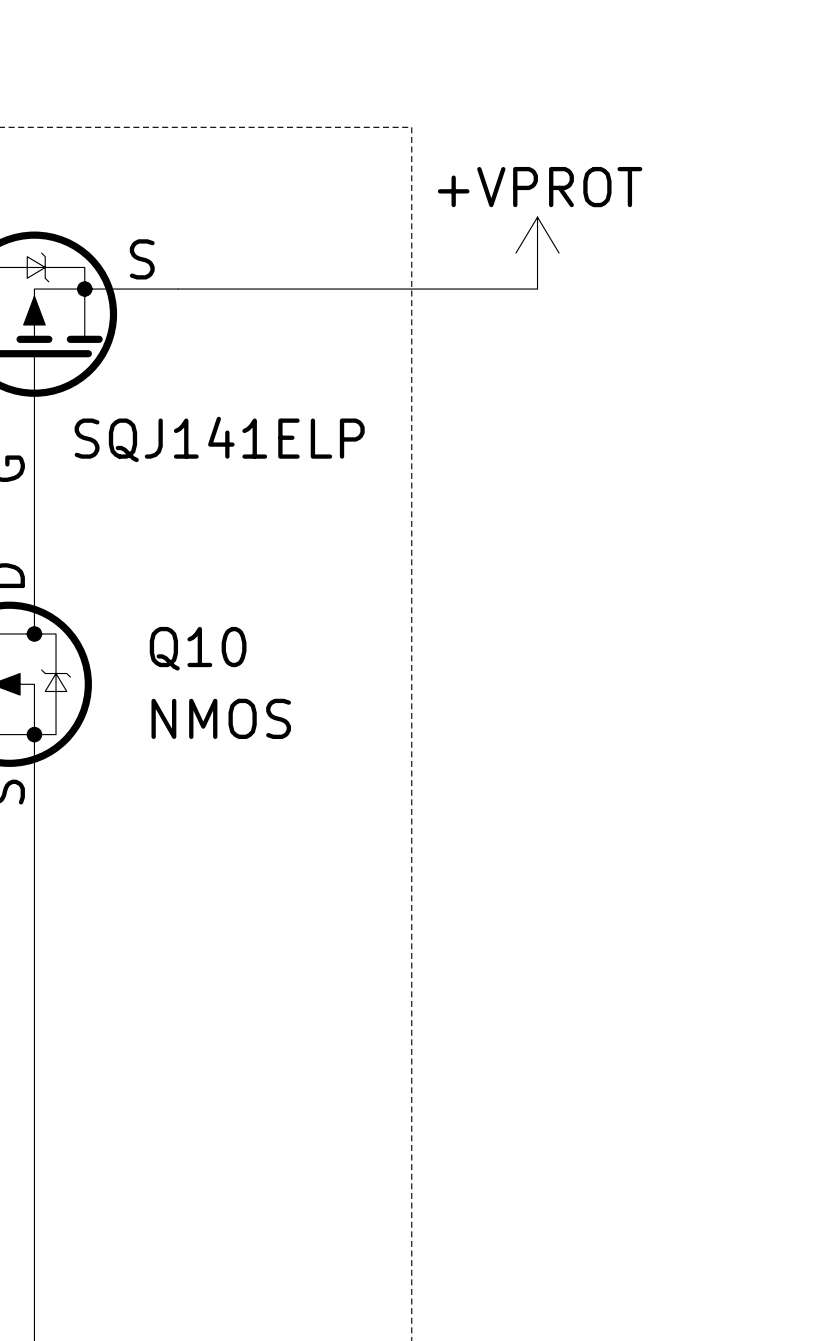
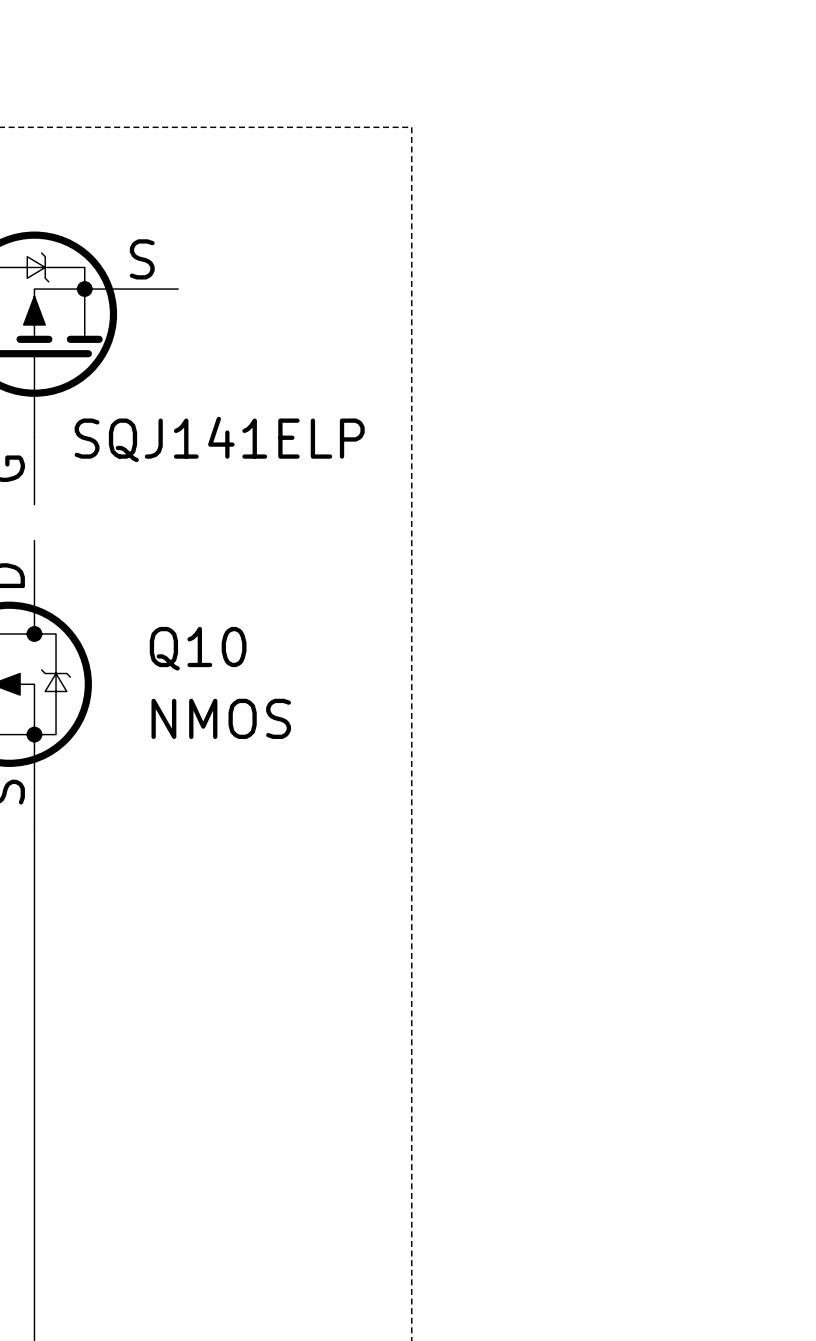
power symbol: +VPROT (537, 253) -> none
wire: (178, 289) (537, 289) -> none
wire: (34, 504) (34, 540) -> none

